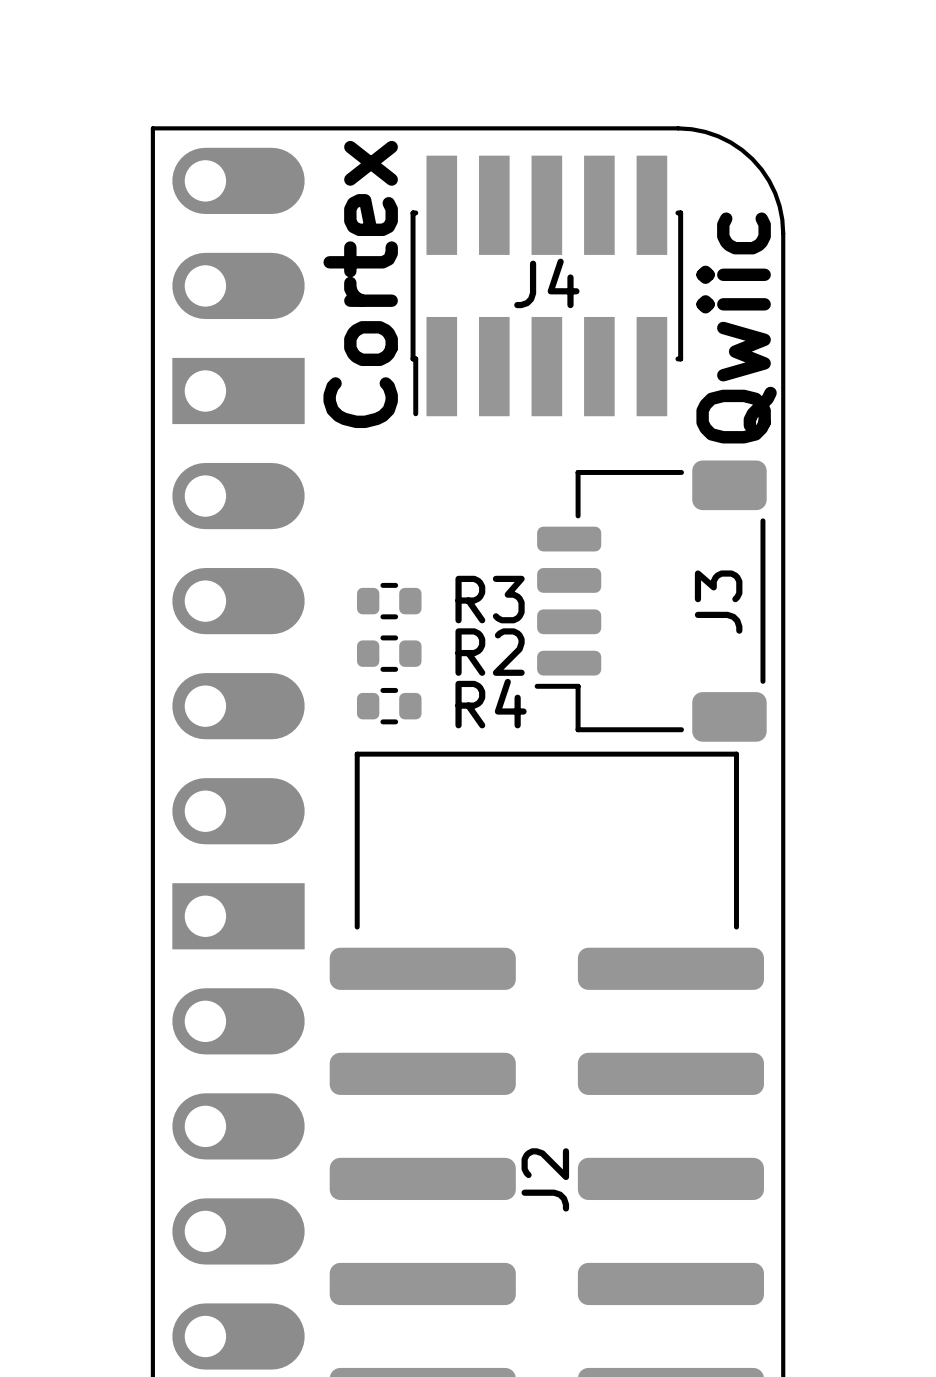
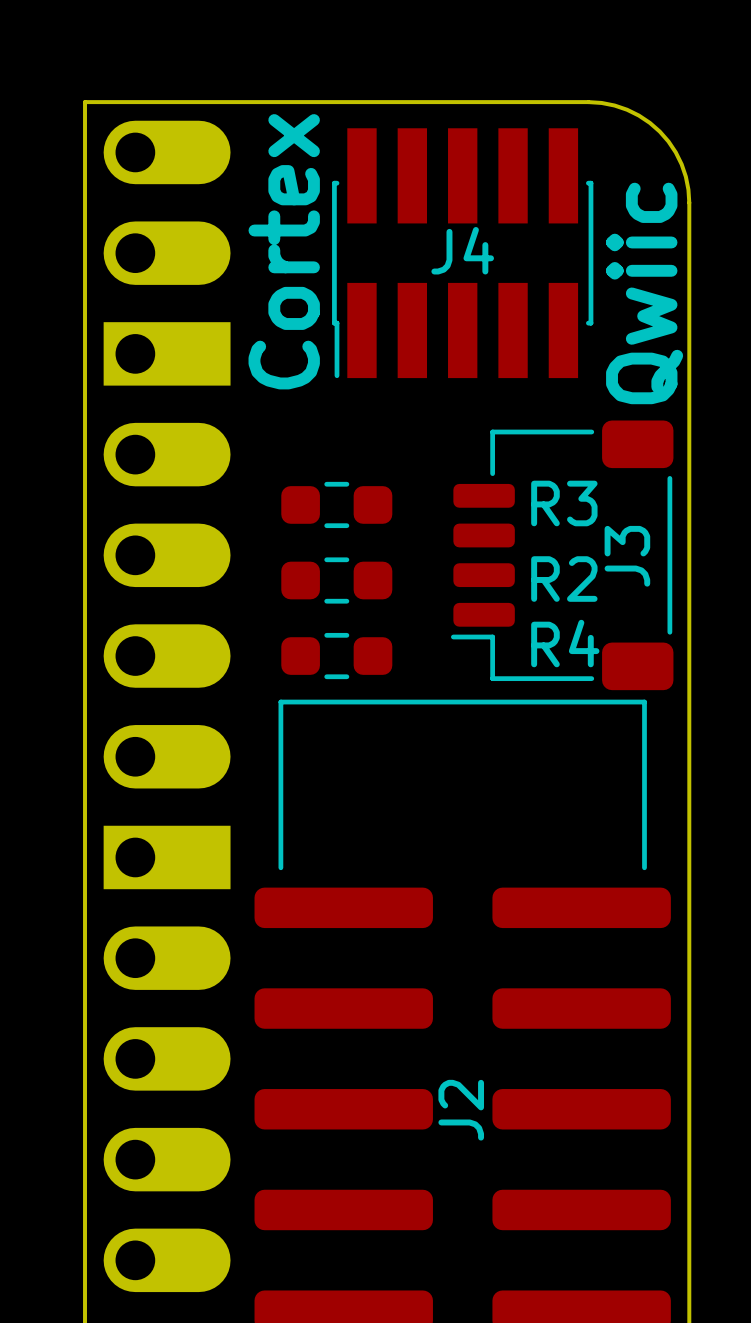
R3 footprint: [357, 582, 422, 620] -> [281, 481, 393, 529]
R3 name position: R3 (490, 599) -> R3 (564, 503)
R2 footprint: [357, 635, 422, 672] -> [281, 557, 393, 604]
R2 name position: R2 (490, 652) -> R2 (564, 579)
R4 footprint: [357, 687, 422, 725] -> [281, 632, 393, 680]
R4 name position: R4 (491, 703) -> R4 (565, 643)

